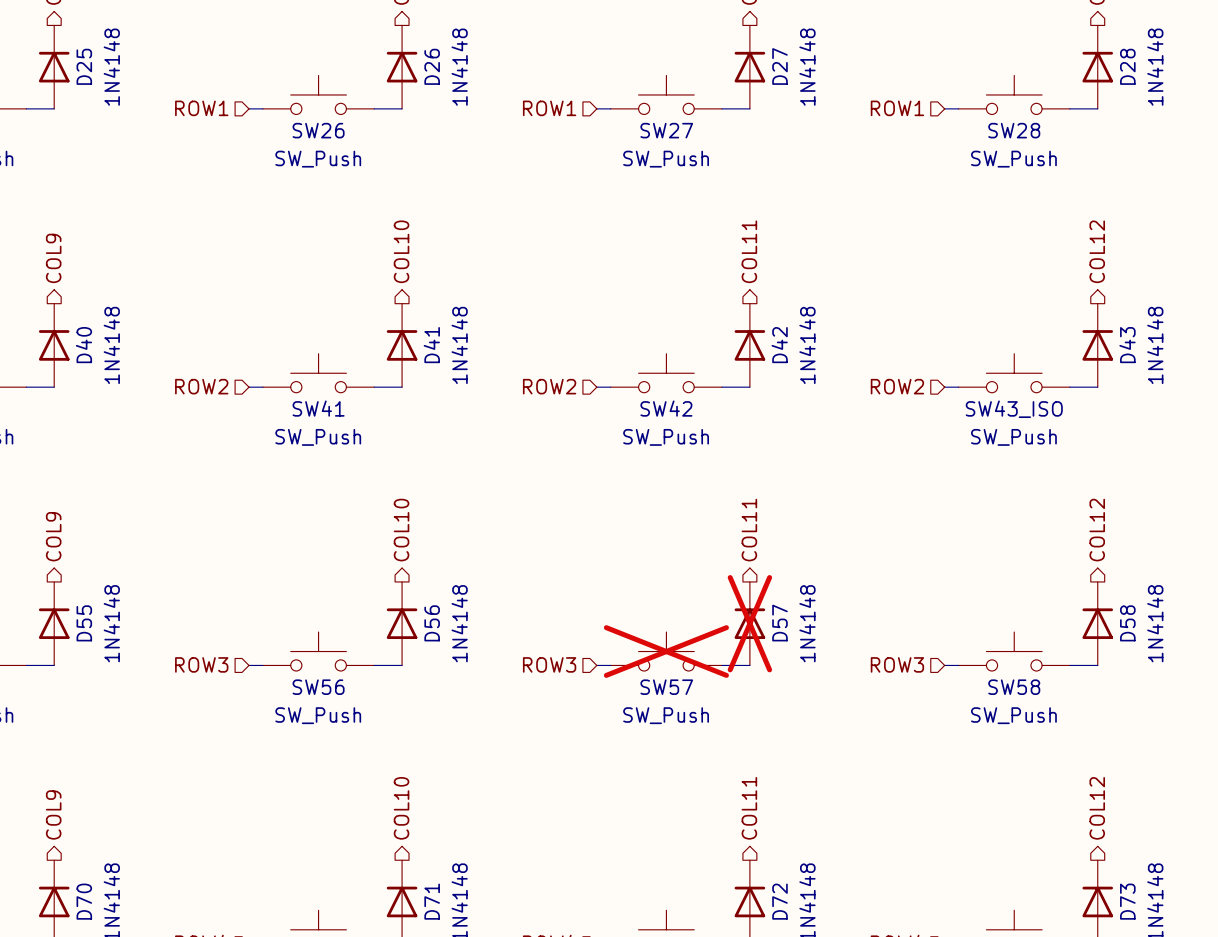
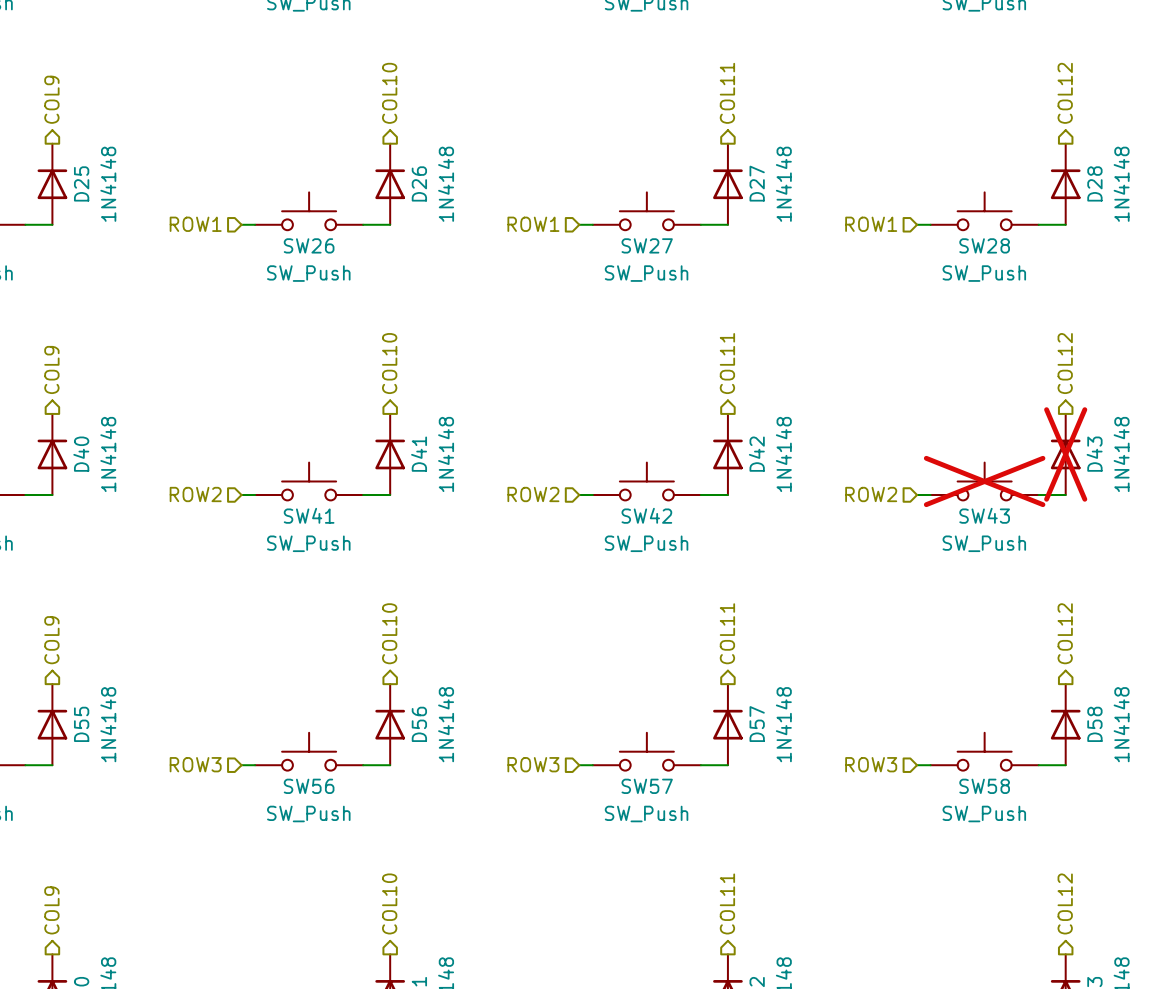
D43 do-not-place cross: none -> (1065, 454)
SW43_ISO do-not-place cross: none -> (984, 481)
SW43_ISO name: SW43_ISO (1014, 409) -> SW43 (984, 515)
D57 do-not-place cross: (749, 623) -> none
SW57 do-not-place cross: (666, 651) -> none

